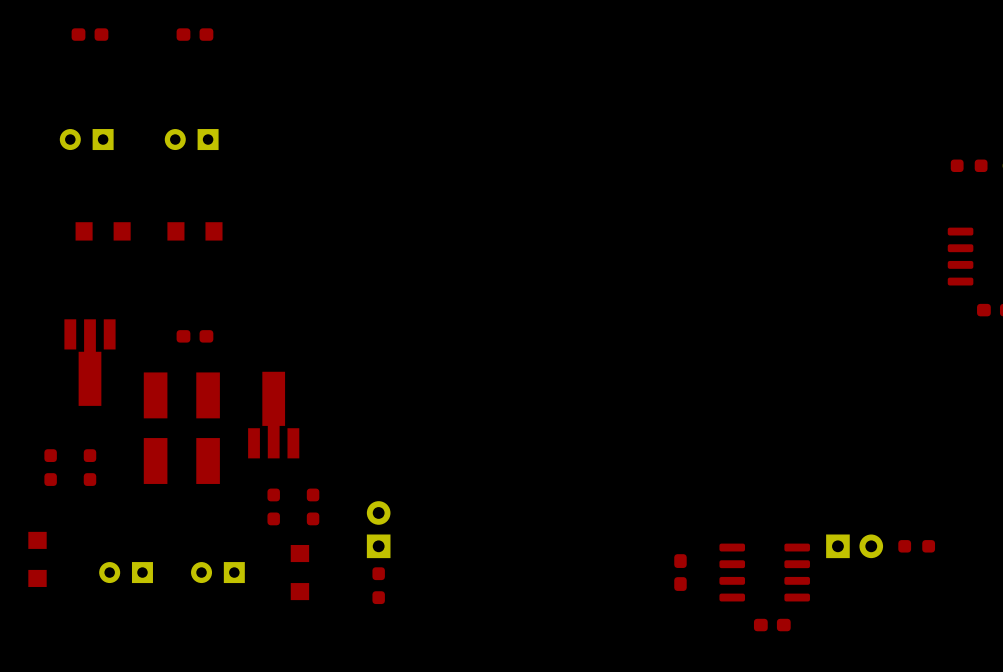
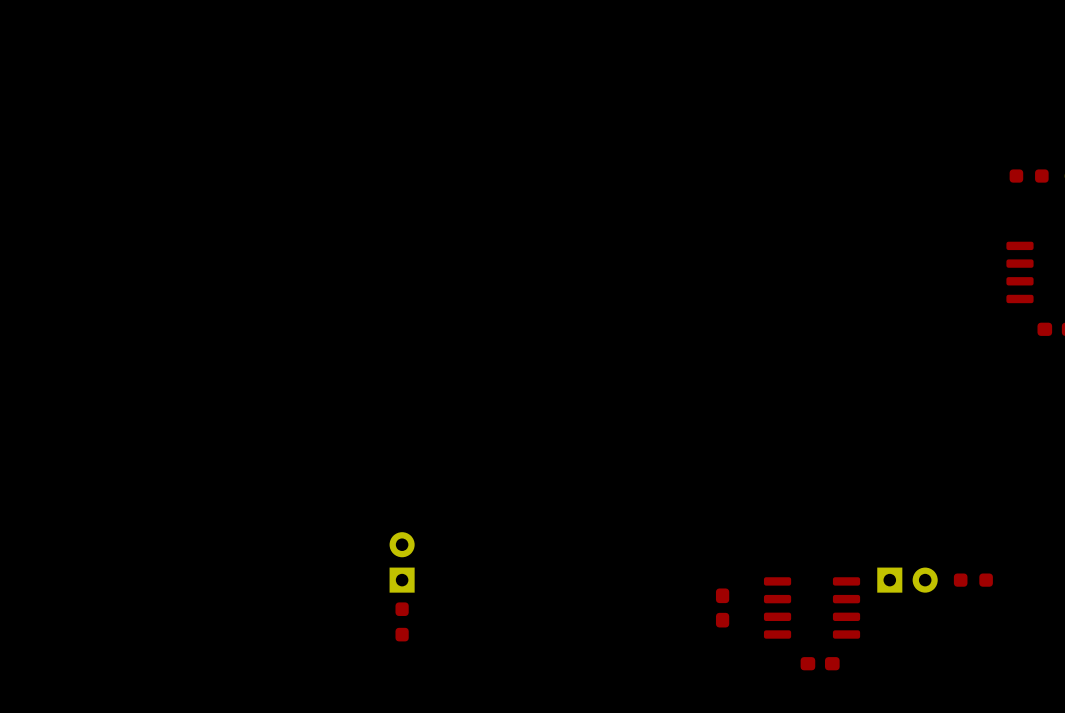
part: (89, 34) -> none
part: (194, 34) -> none
part: (86, 139) -> none
part: (191, 139) -> none
part: (103, 231) -> none
part: (194, 231) -> none
part: (194, 336) -> none
part: (89, 362) -> none
part: (273, 415) -> none
part: (155, 428) -> none
part: (208, 428) -> none
part: (50, 467) -> none
part: (89, 467) -> none
part: (273, 506) -> none
part: (313, 506) -> none
part: (37, 559) -> none
part: (126, 572) -> none
part: (217, 572) -> none
part: (299, 572) -> none

